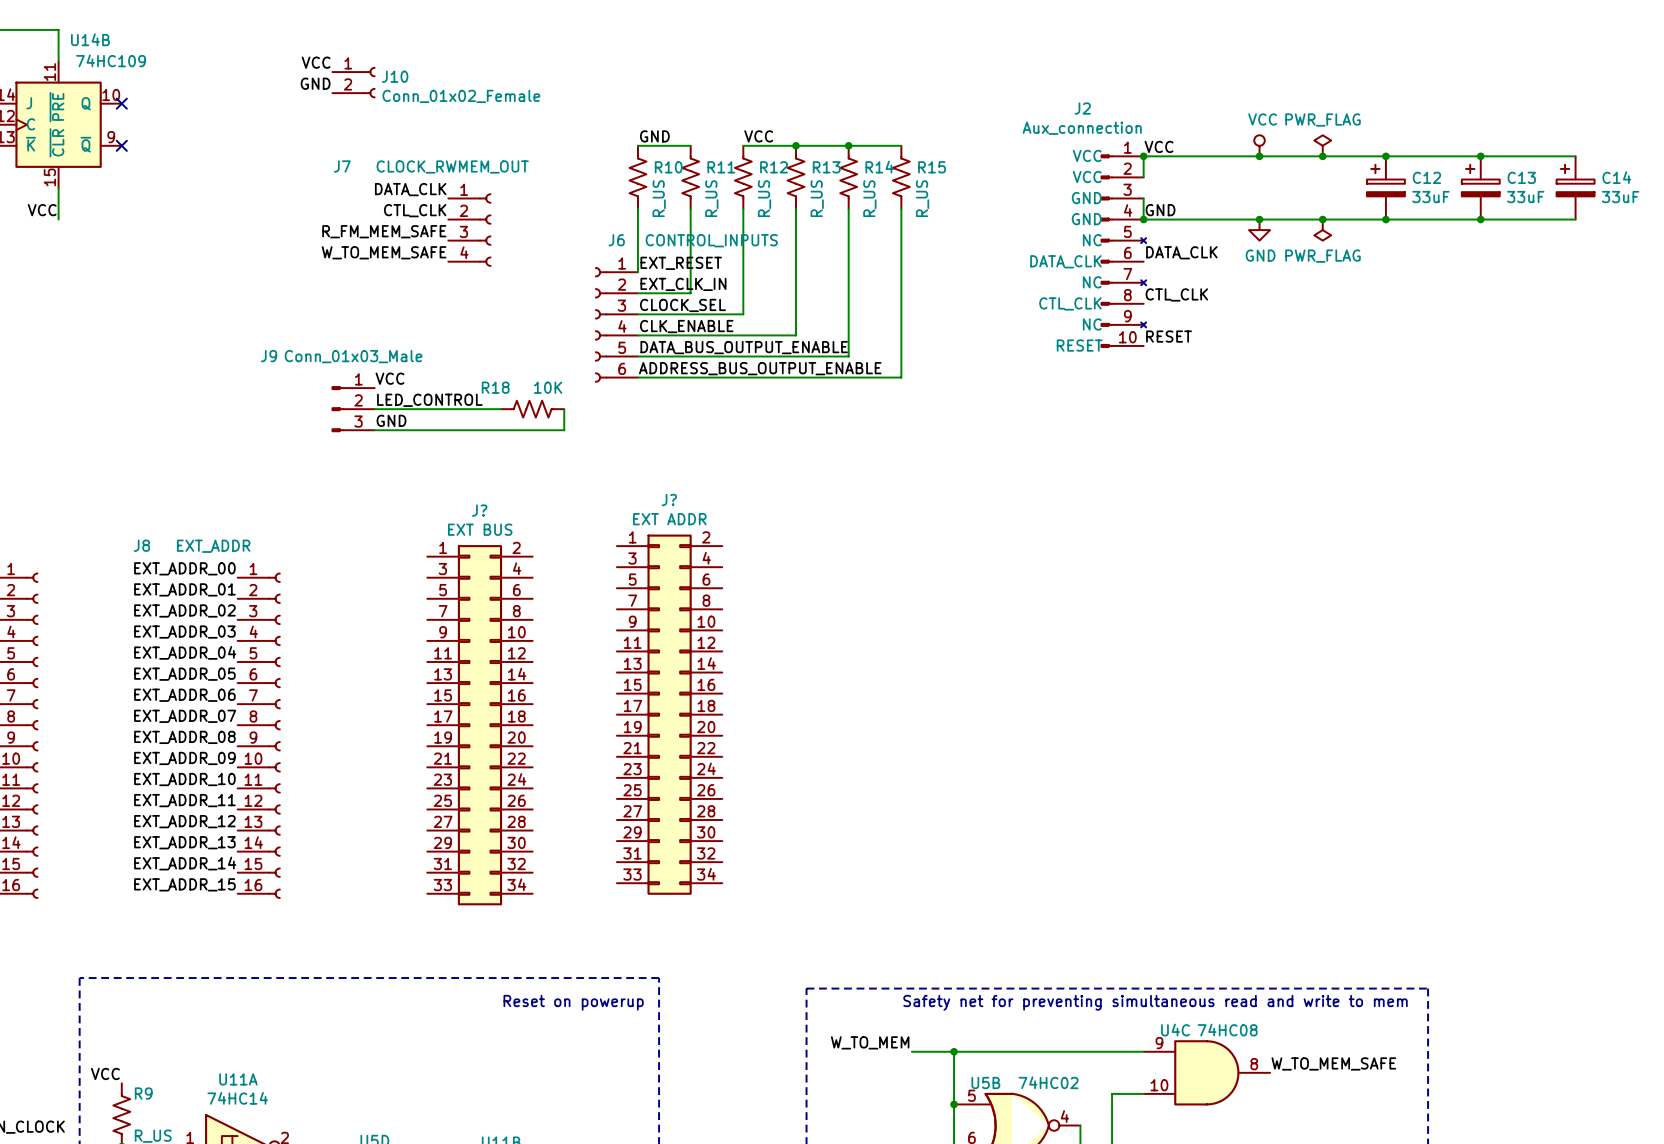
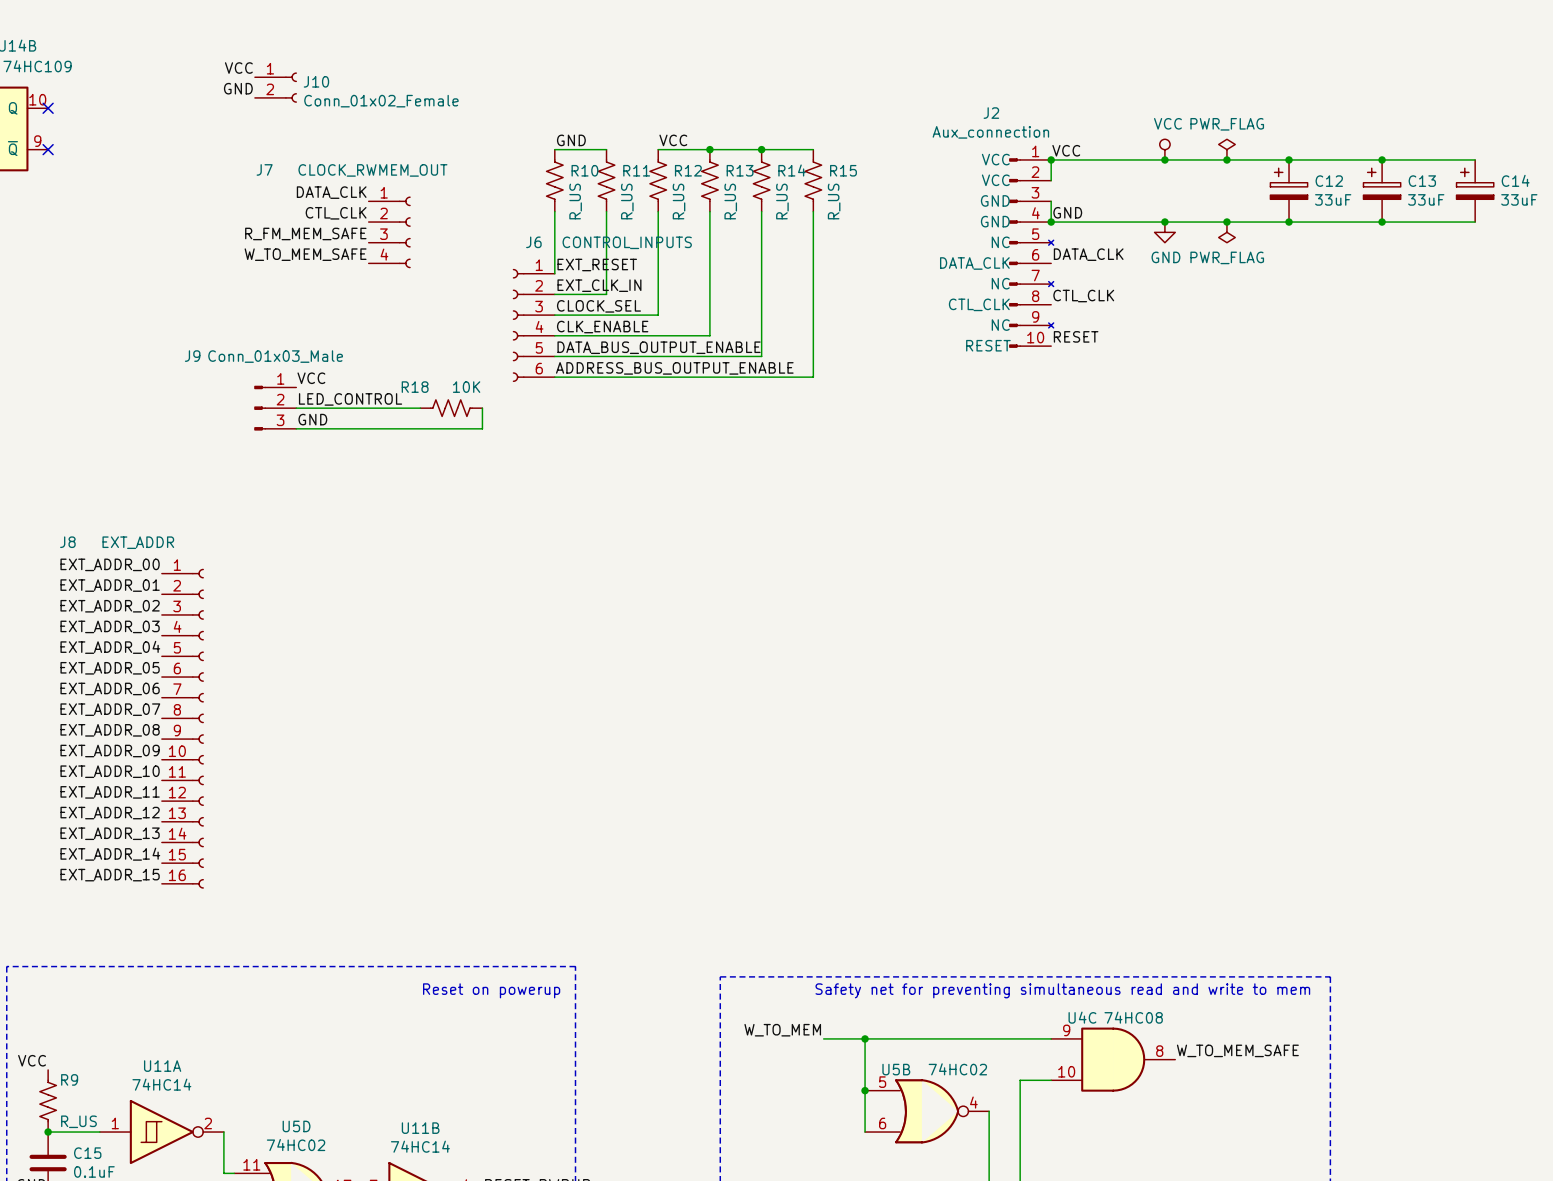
J?: EXT ADDR (669, 714) -> none
J?: EXT BUS (479, 725) -> none

